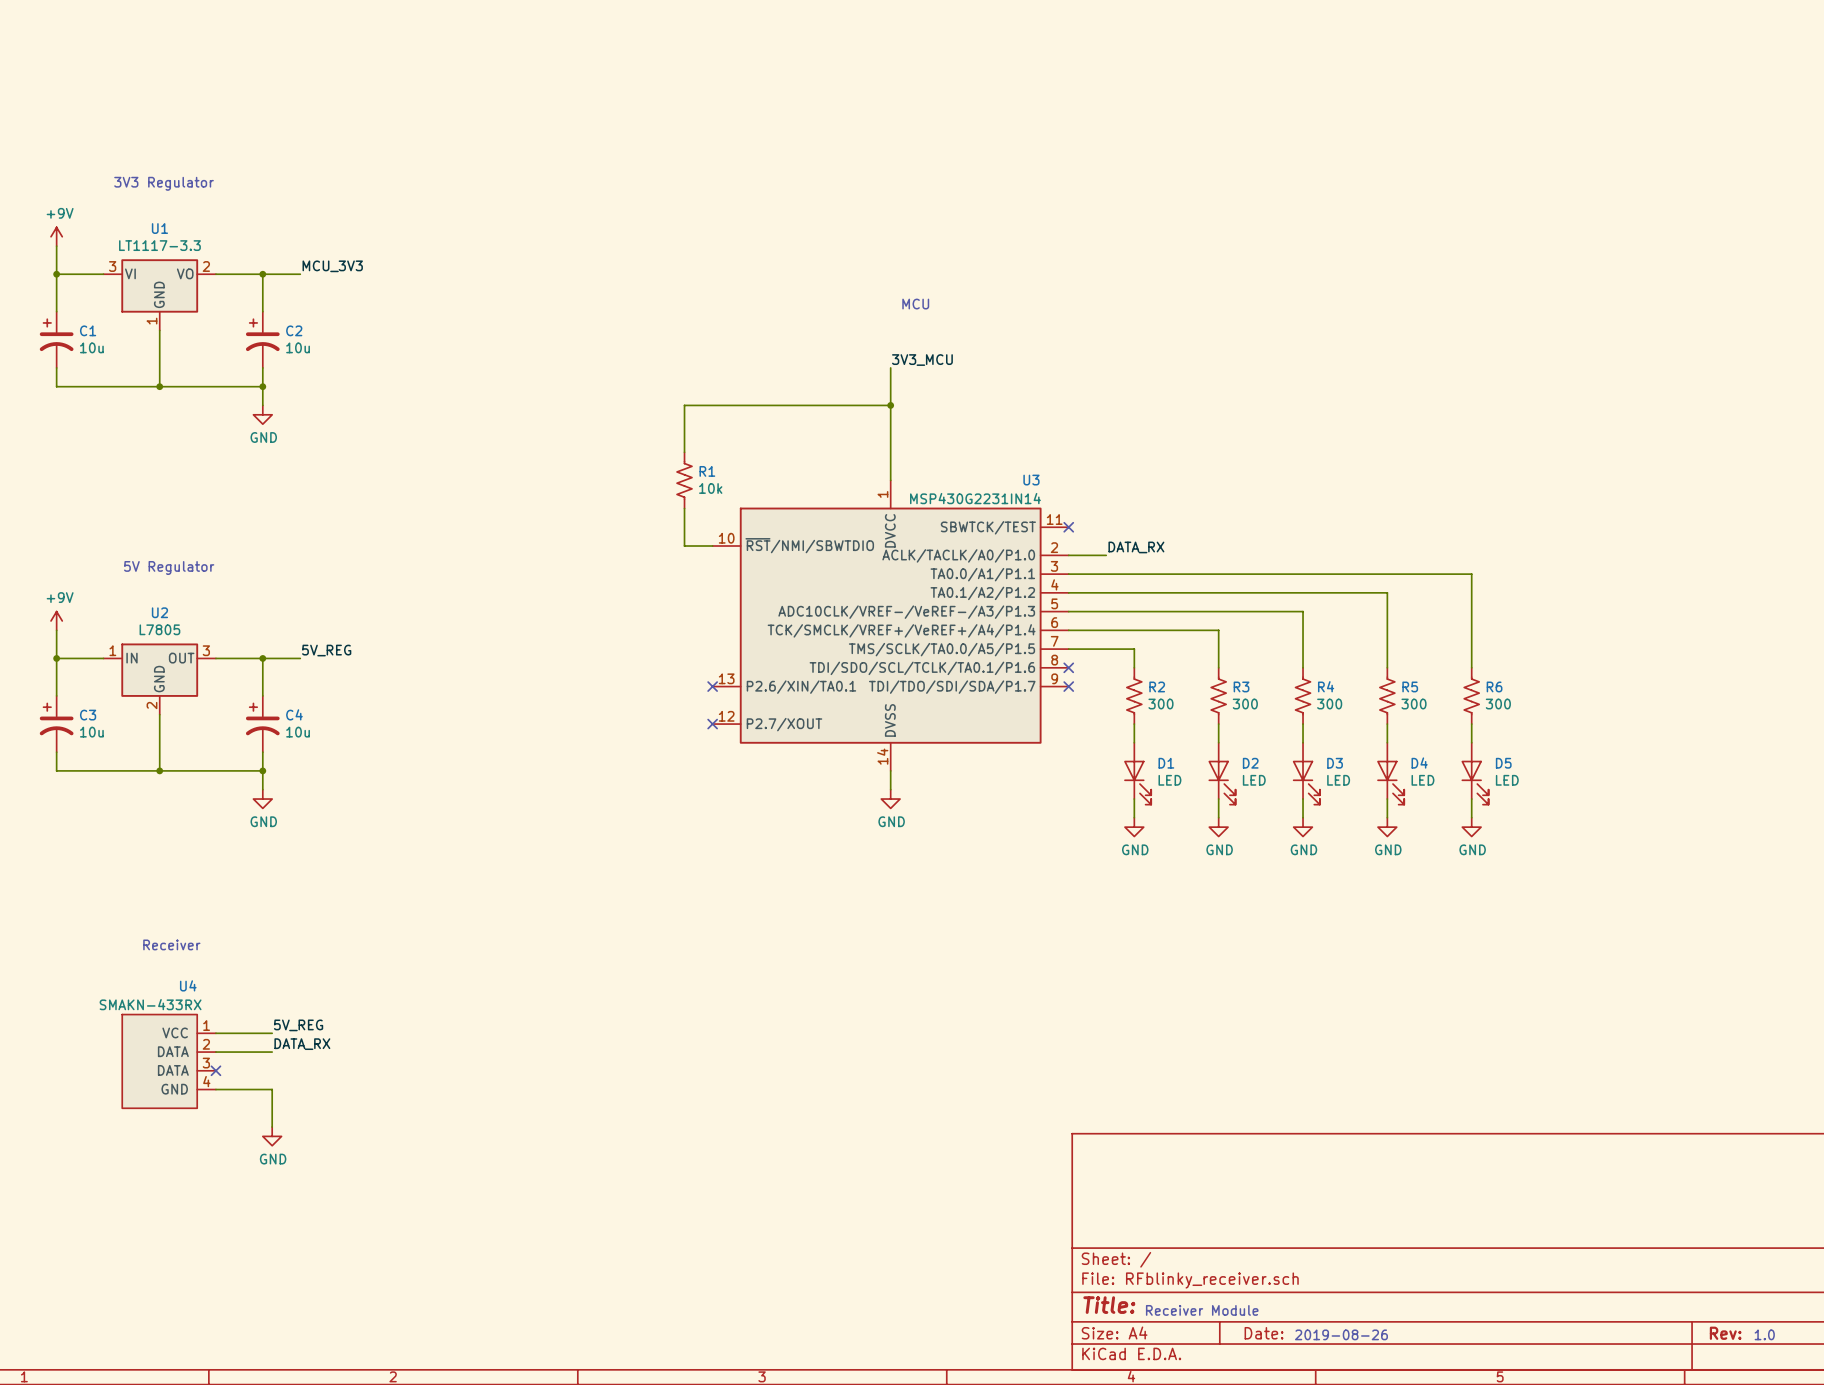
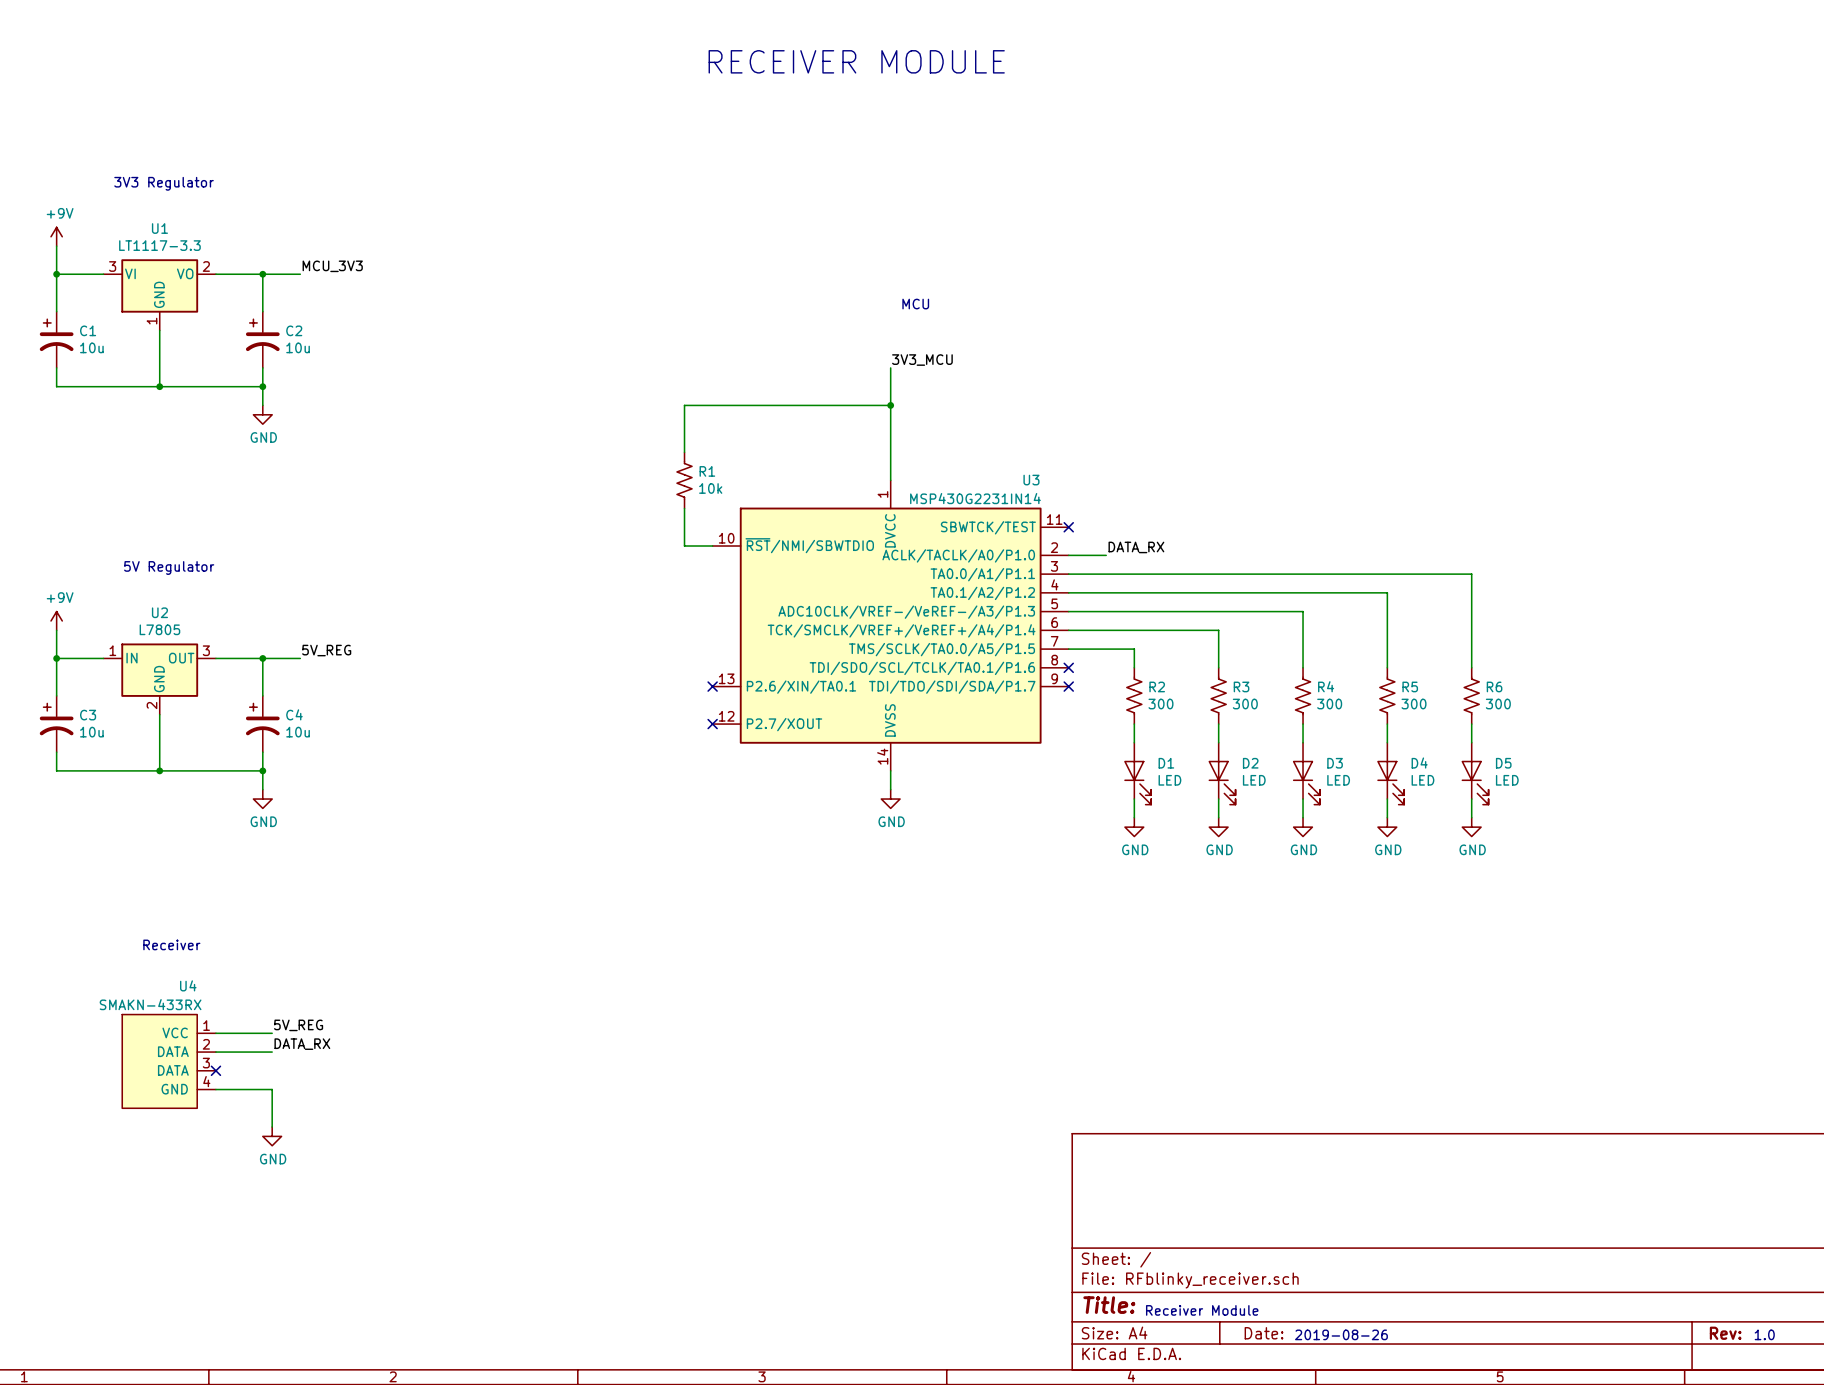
text: none -> RECEIVER MODULE (856, 61)

